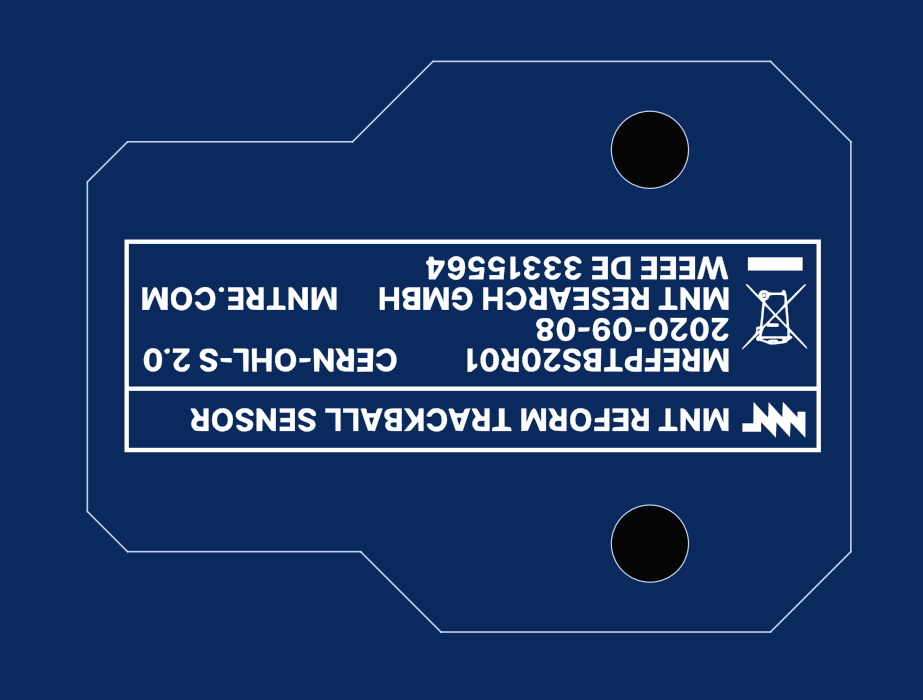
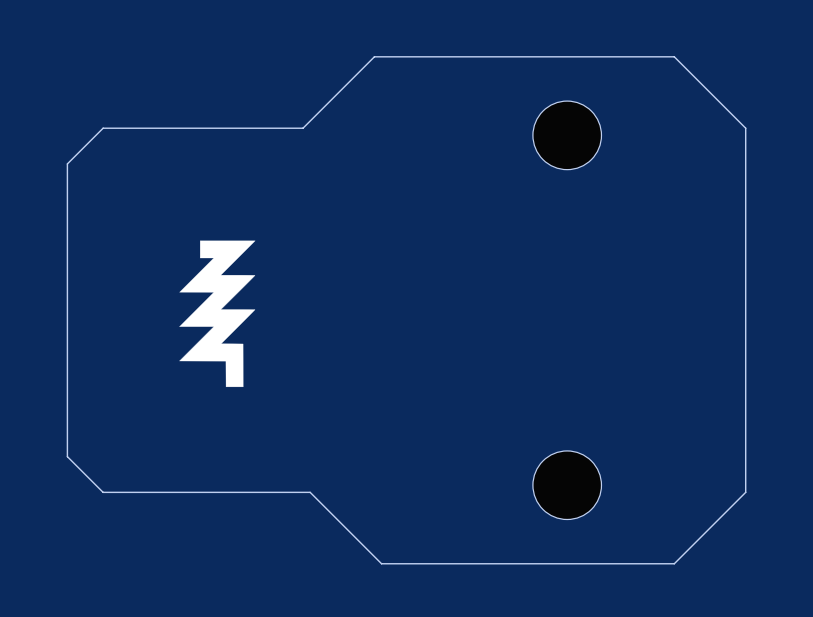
drawing: [124, 239, 822, 453] -> none
drawing: none -> [179, 240, 256, 388]

